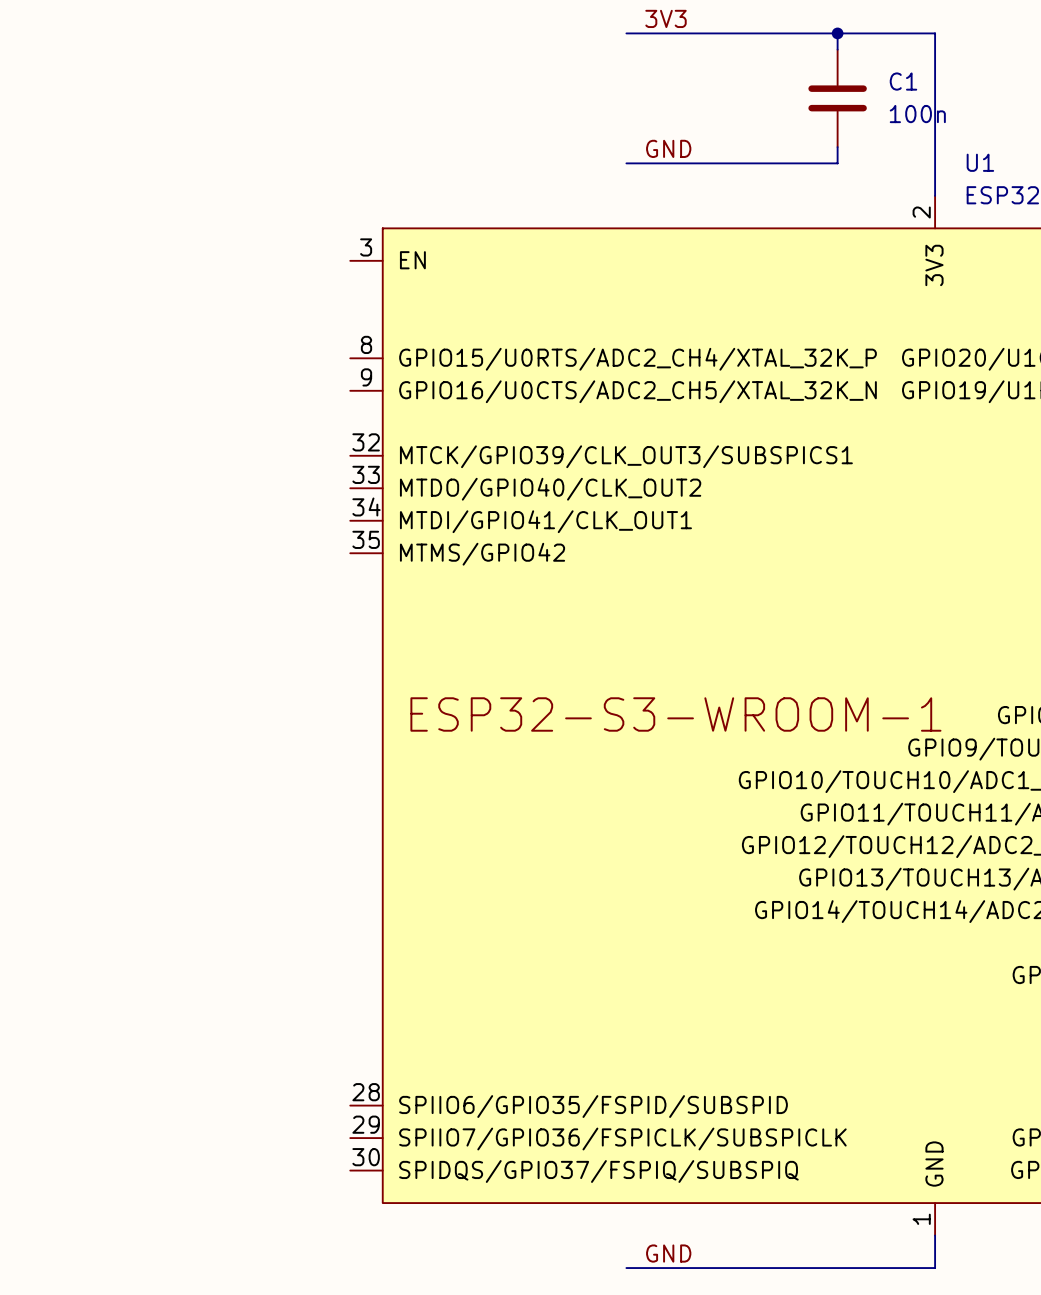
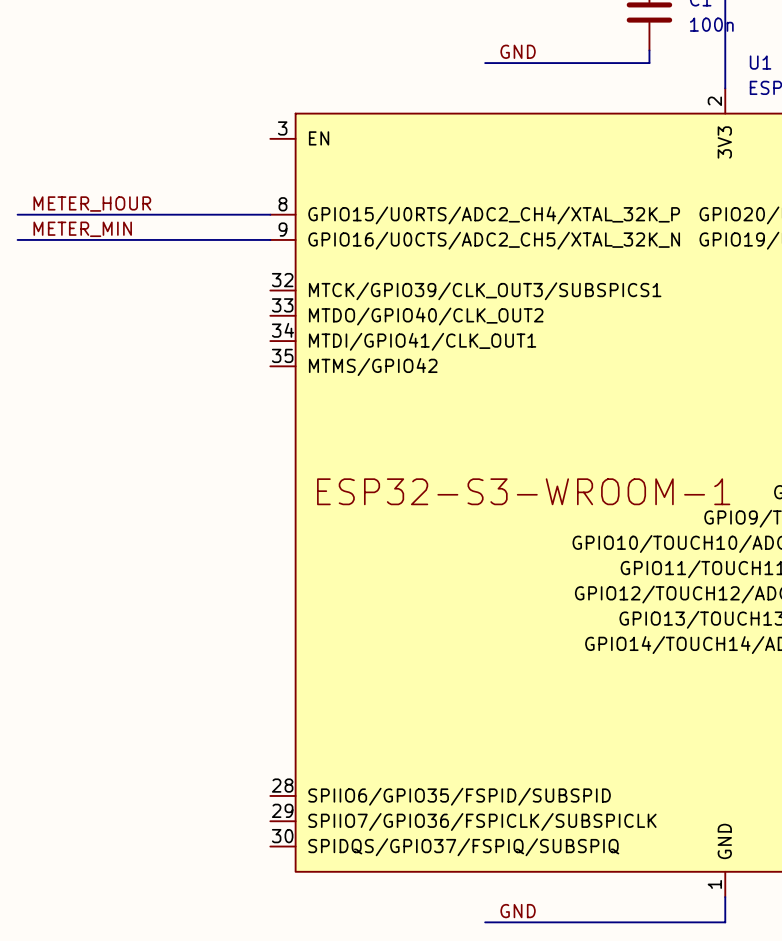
label: none -> METER_HOUR (92, 204)
wire: none -> (17, 214) (270, 214)
label: none -> METER_MIN (82, 229)
wire: none -> (17, 239) (270, 239)

